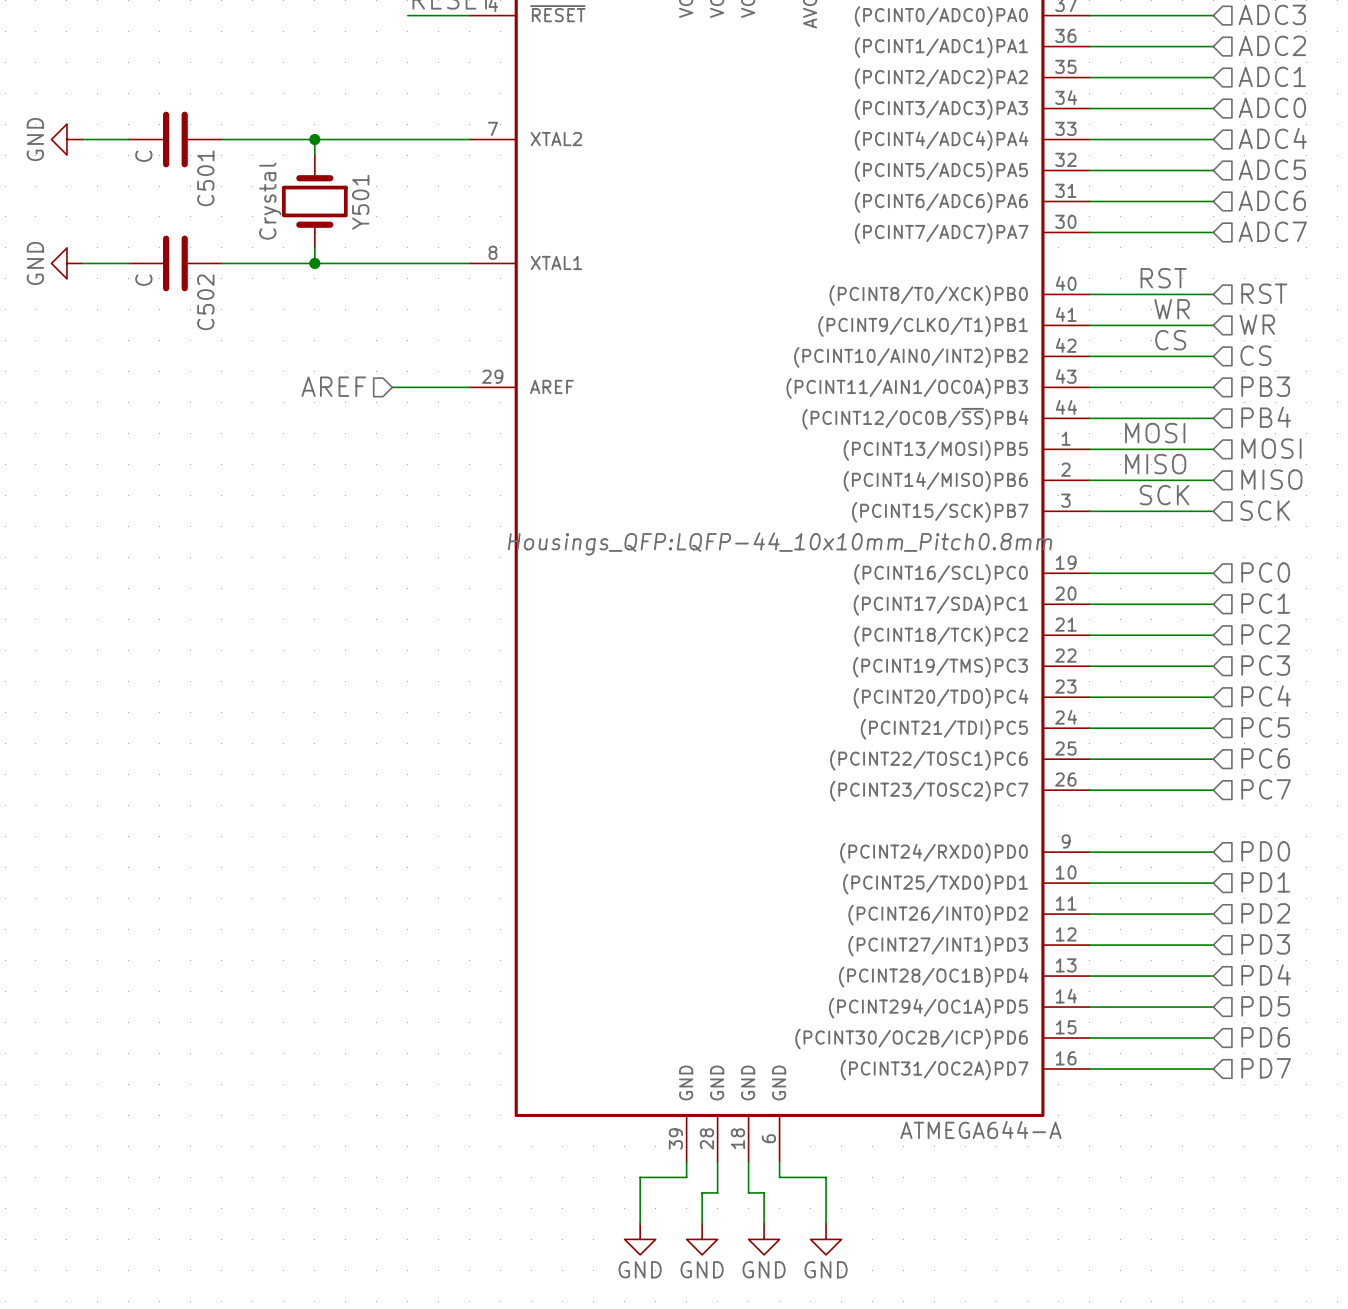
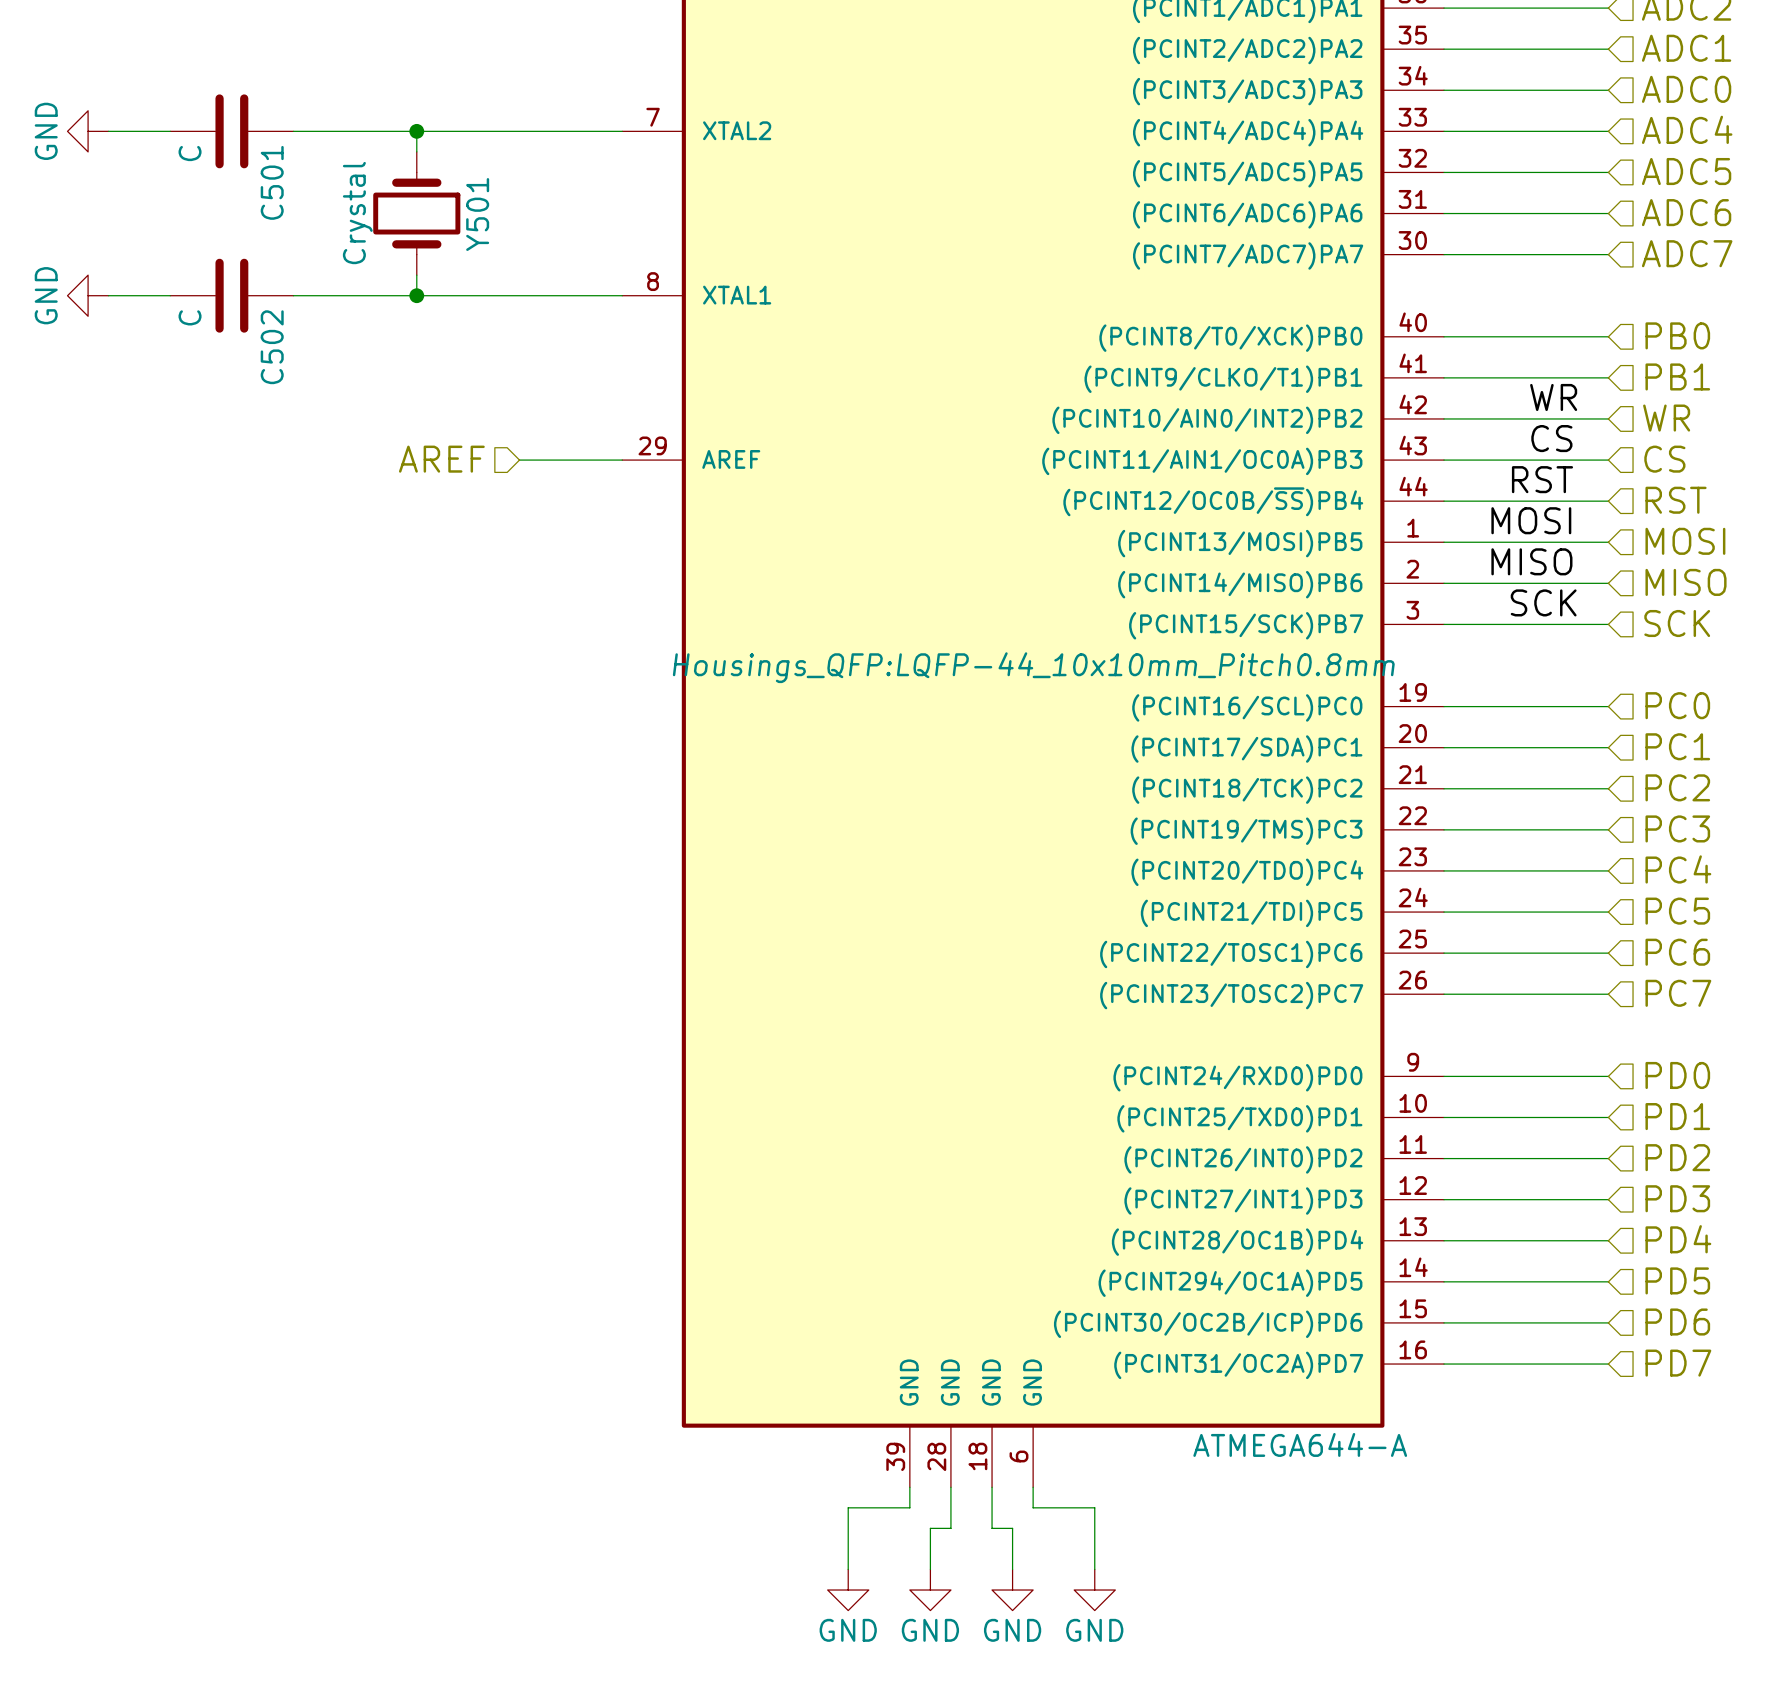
label position: RST (1163, 278) -> RST (1542, 479)
hierarchical label: RST (1264, 293) -> PB0 (1677, 335)
label: WR (1172, 309) -> none
hierarchical label: WR (1257, 324) -> PB1 (1677, 376)
label: CS (1170, 340) -> WR (1553, 397)
hierarchical label: CS (1255, 355) -> WR (1666, 418)
label: none -> CS (1551, 438)
hierarchical label: PB3 (1265, 386) -> CS (1664, 459)
hierarchical label: PB4 (1266, 417) -> RST (1676, 500)

